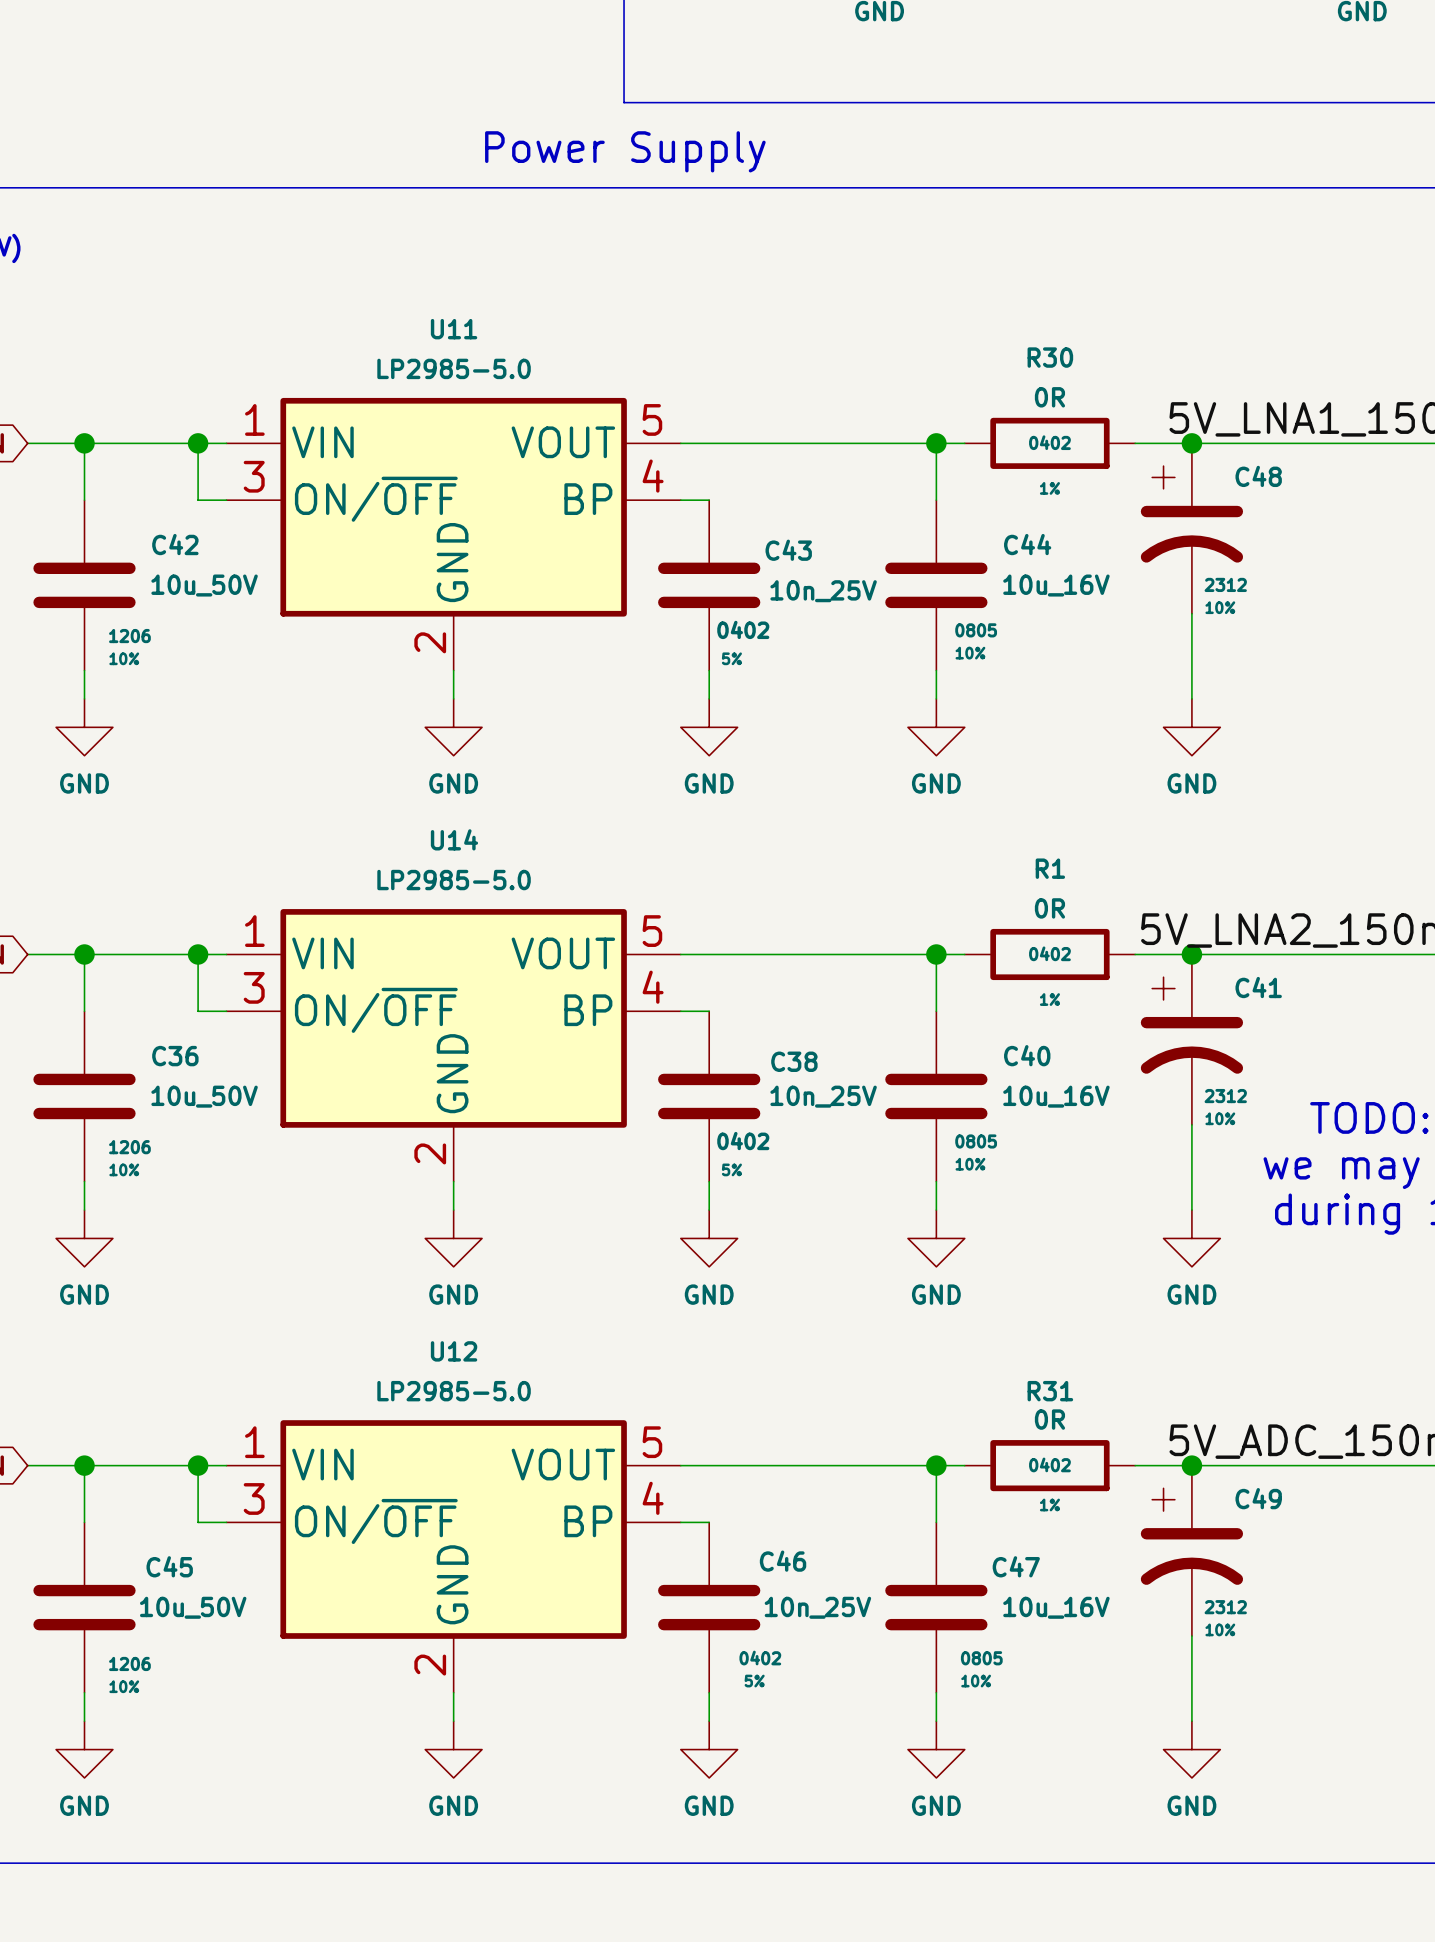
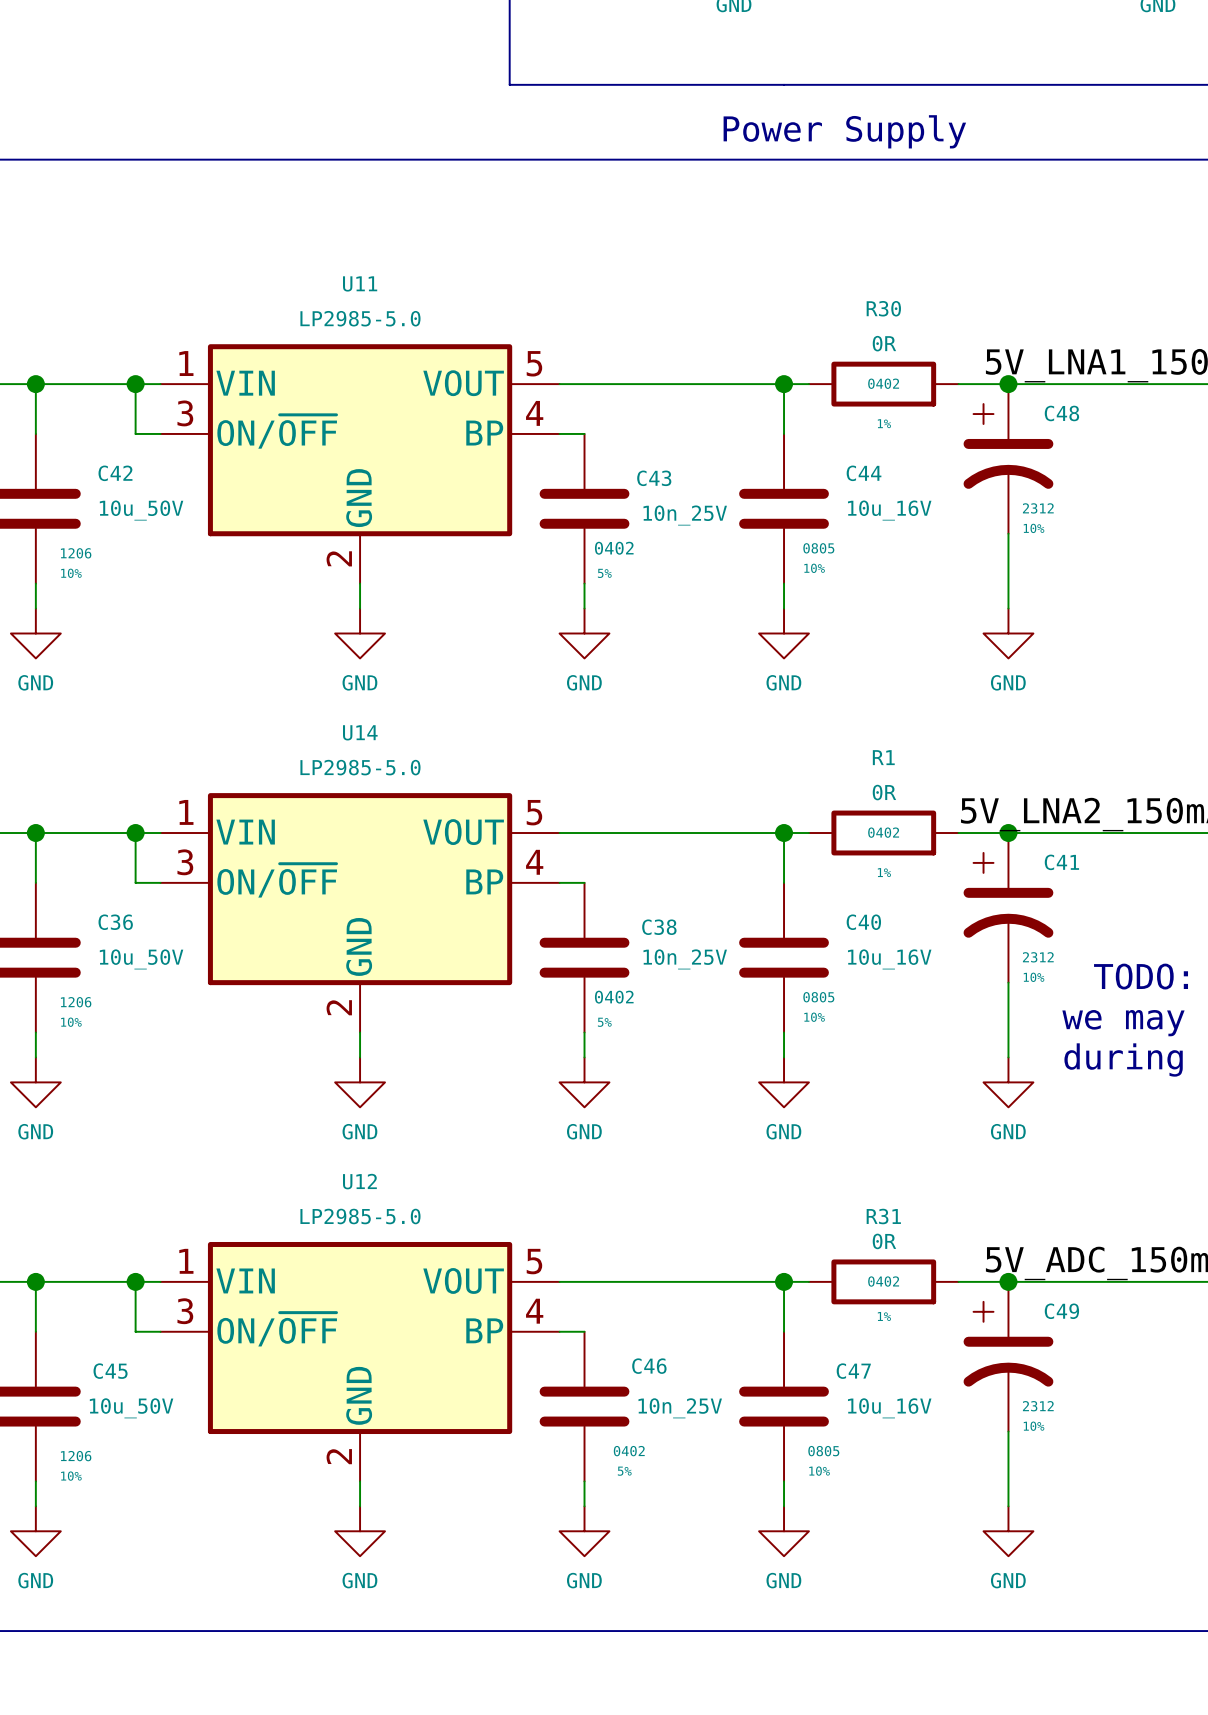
text position: Power Supply (625, 151) -> Power Supply (844, 131)

